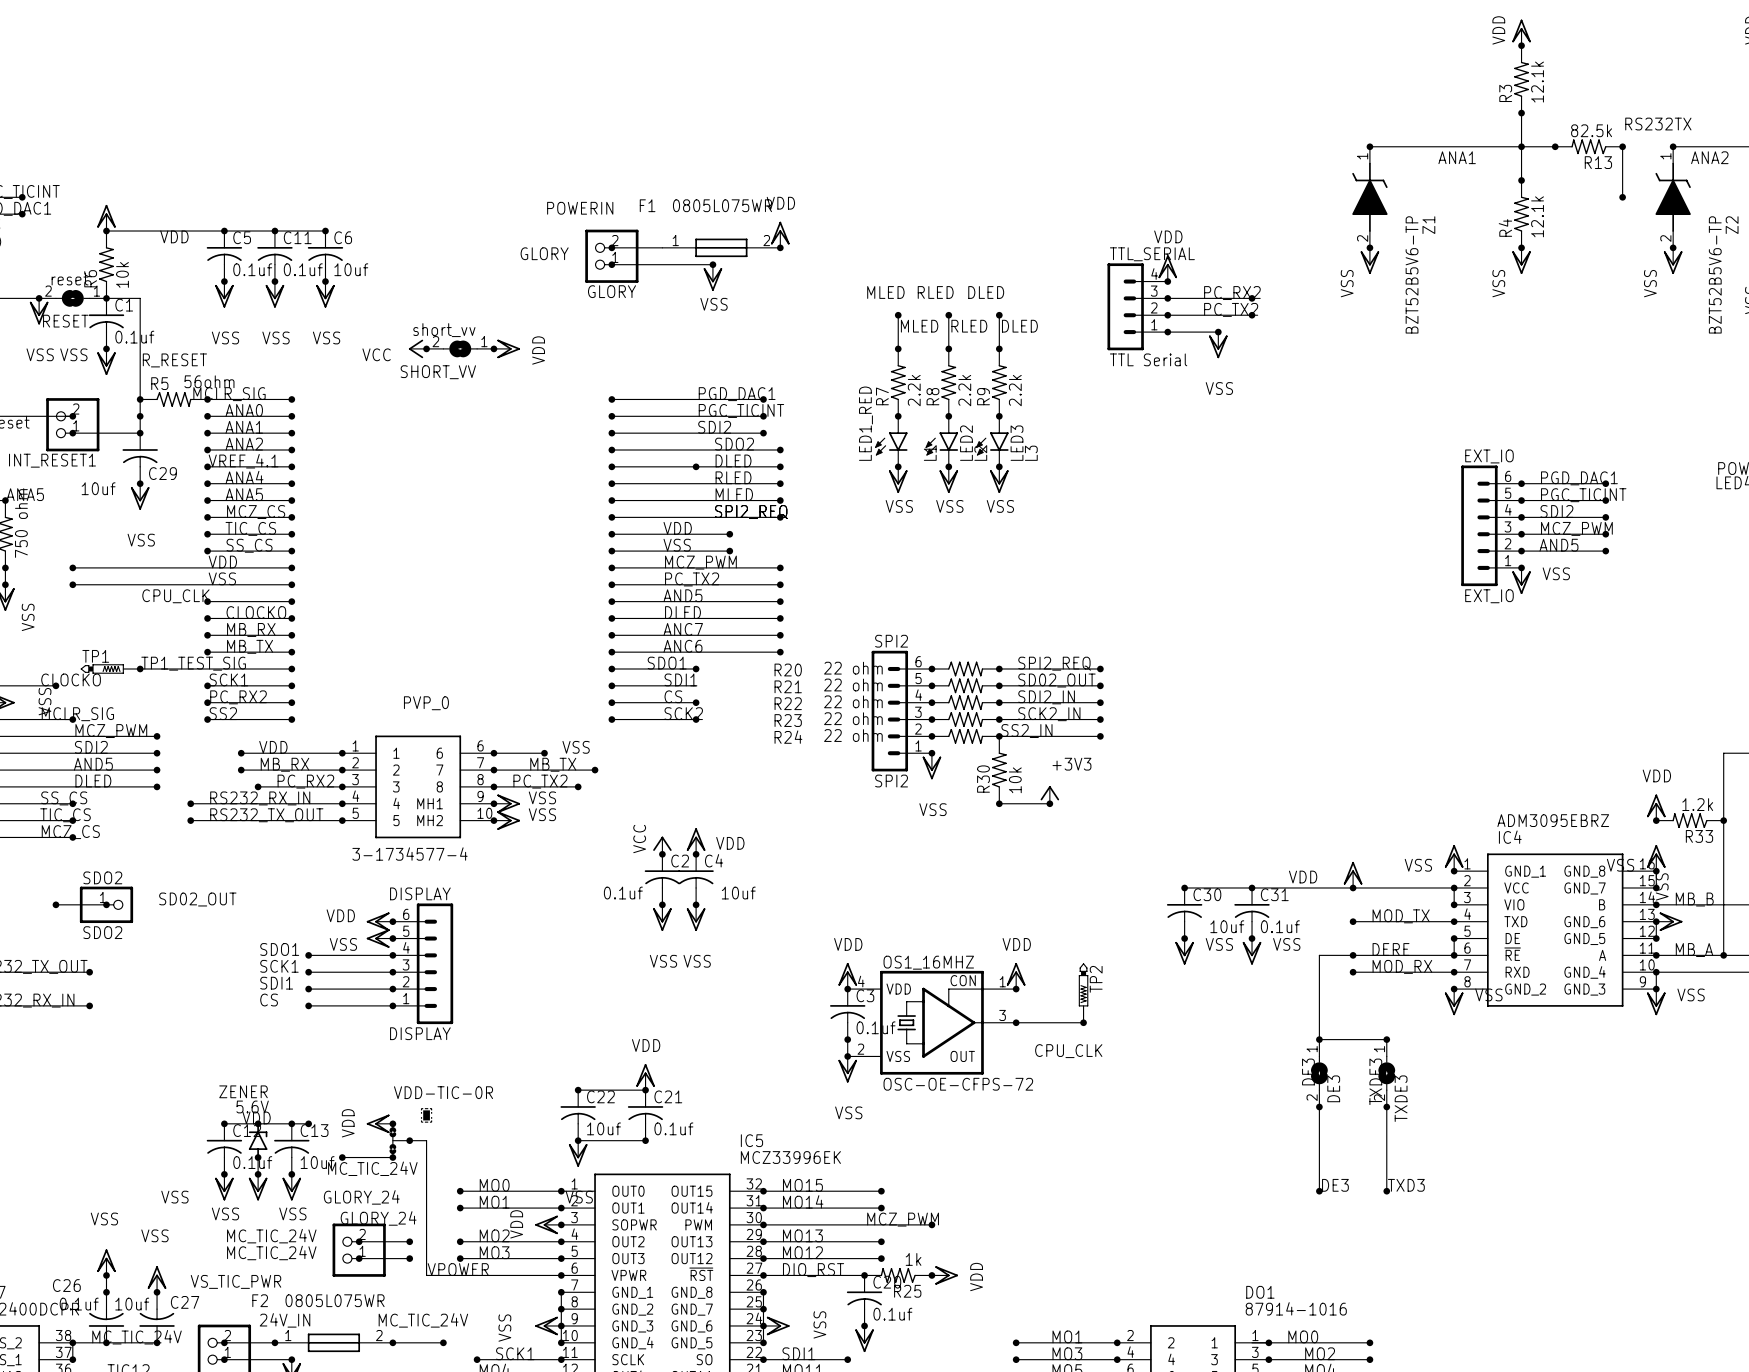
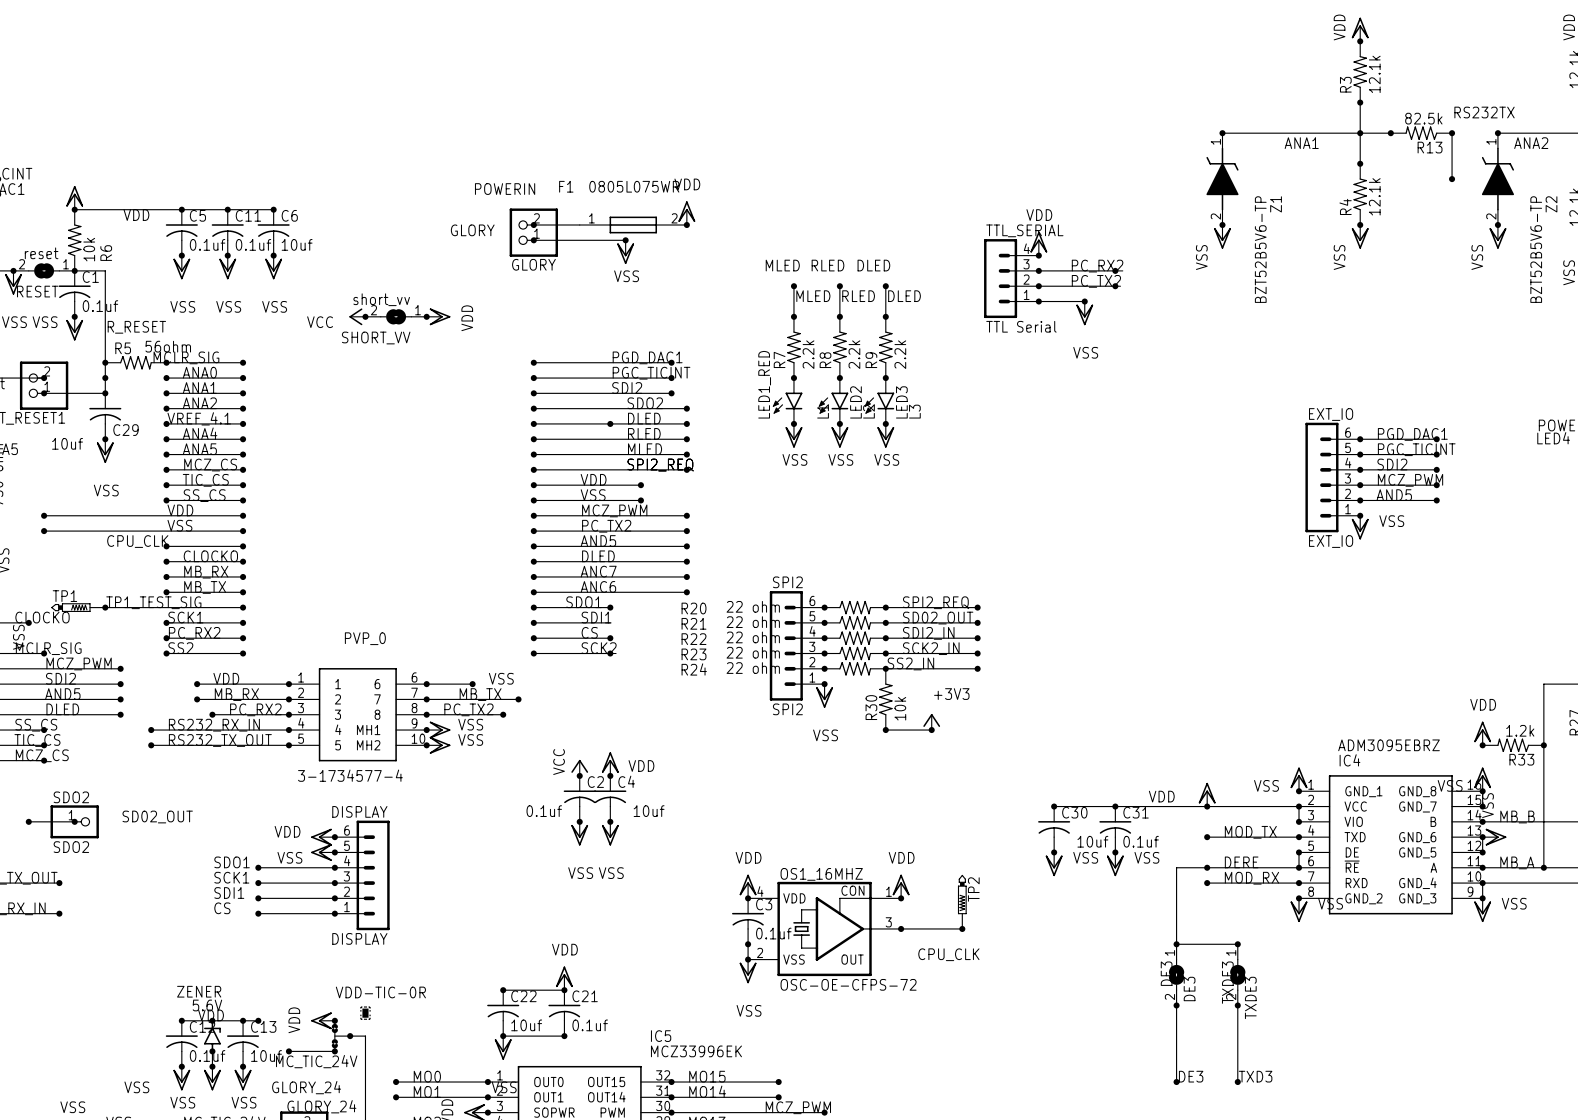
R6 name position: R6 (90, 278) -> R6 (106, 253)

